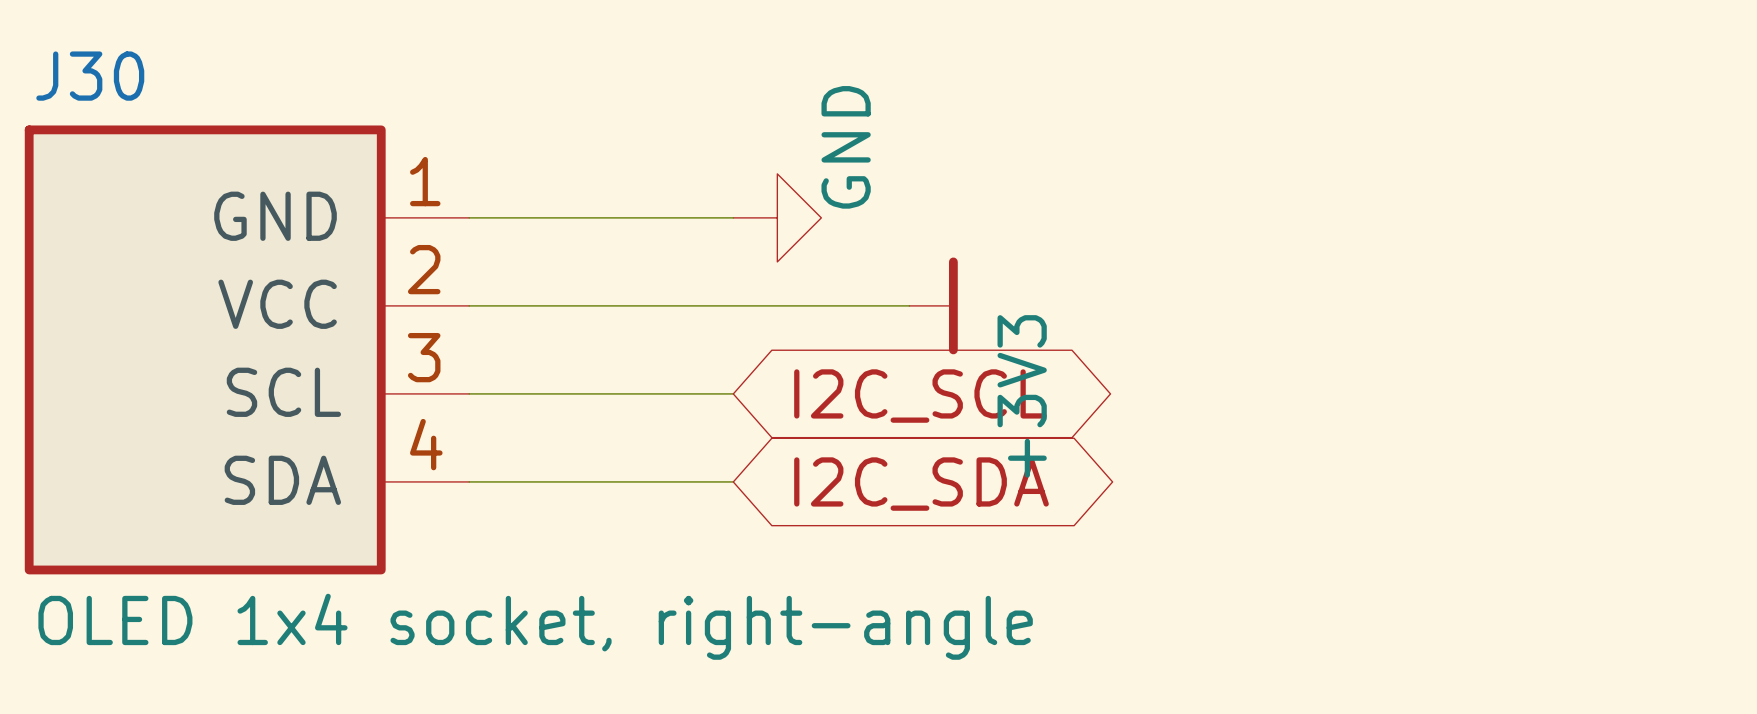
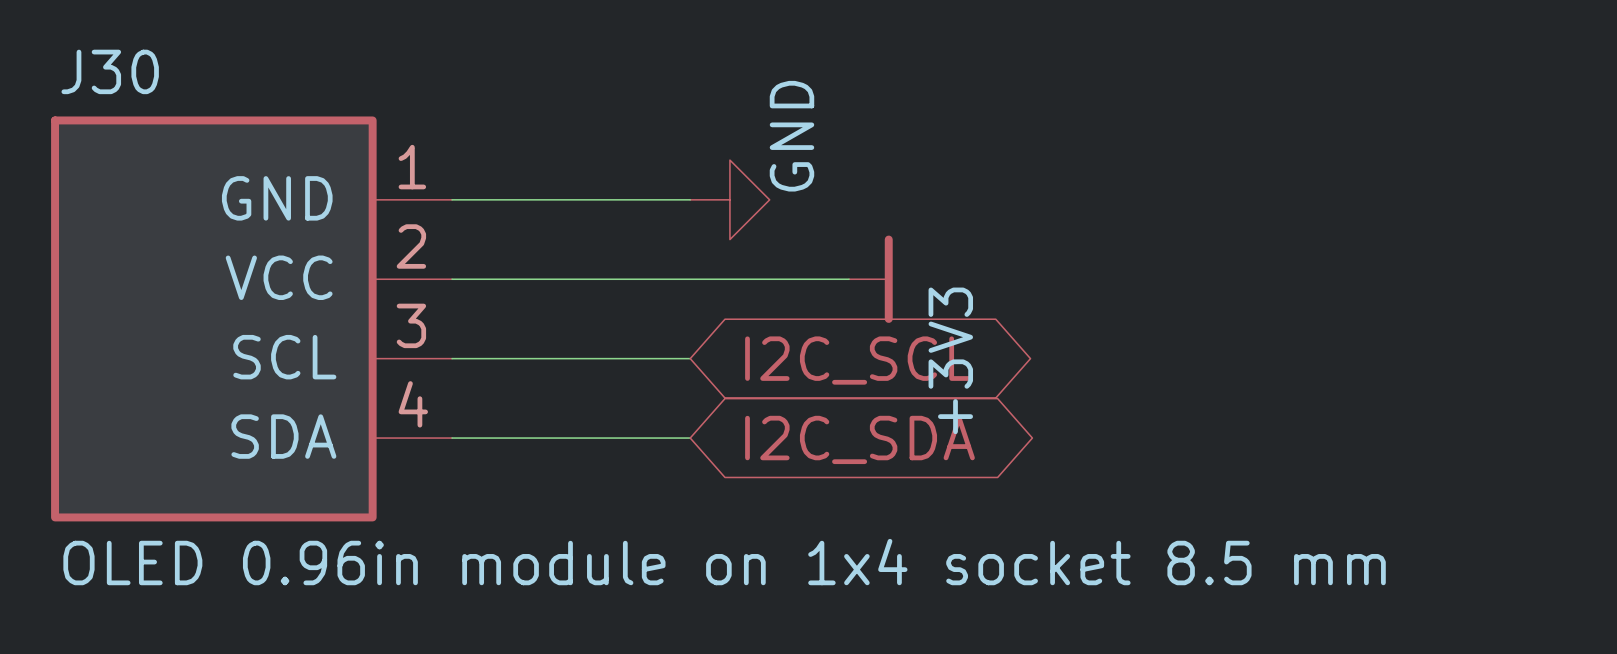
J30 value: OLED 1x4 socket, right-angle (535, 626) -> OLED 0.96in module on 1x4 socket 8.5 mm (724, 562)

